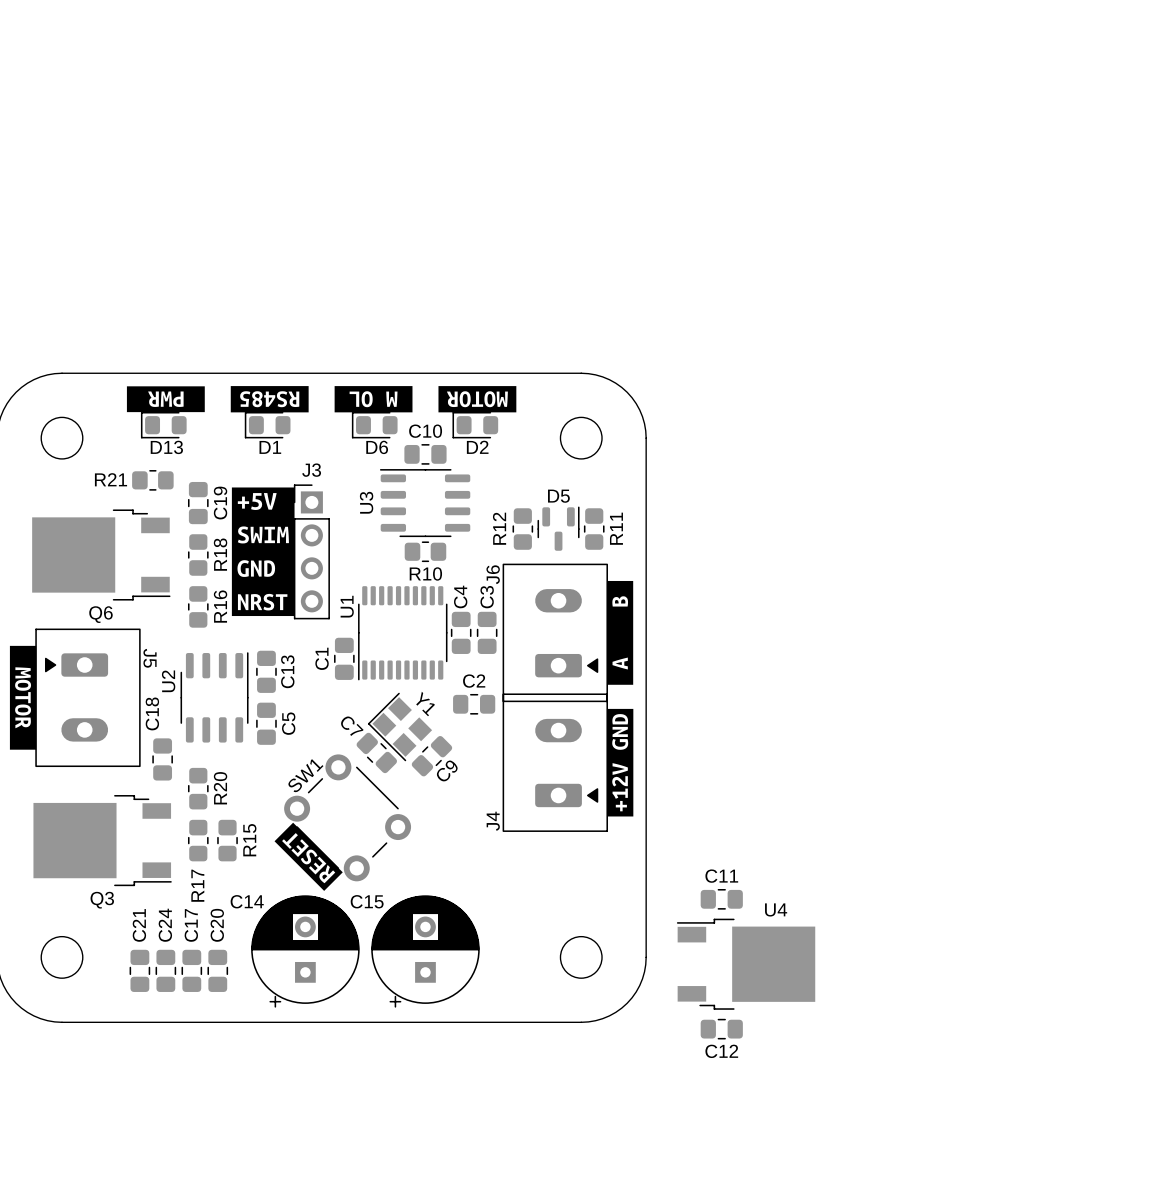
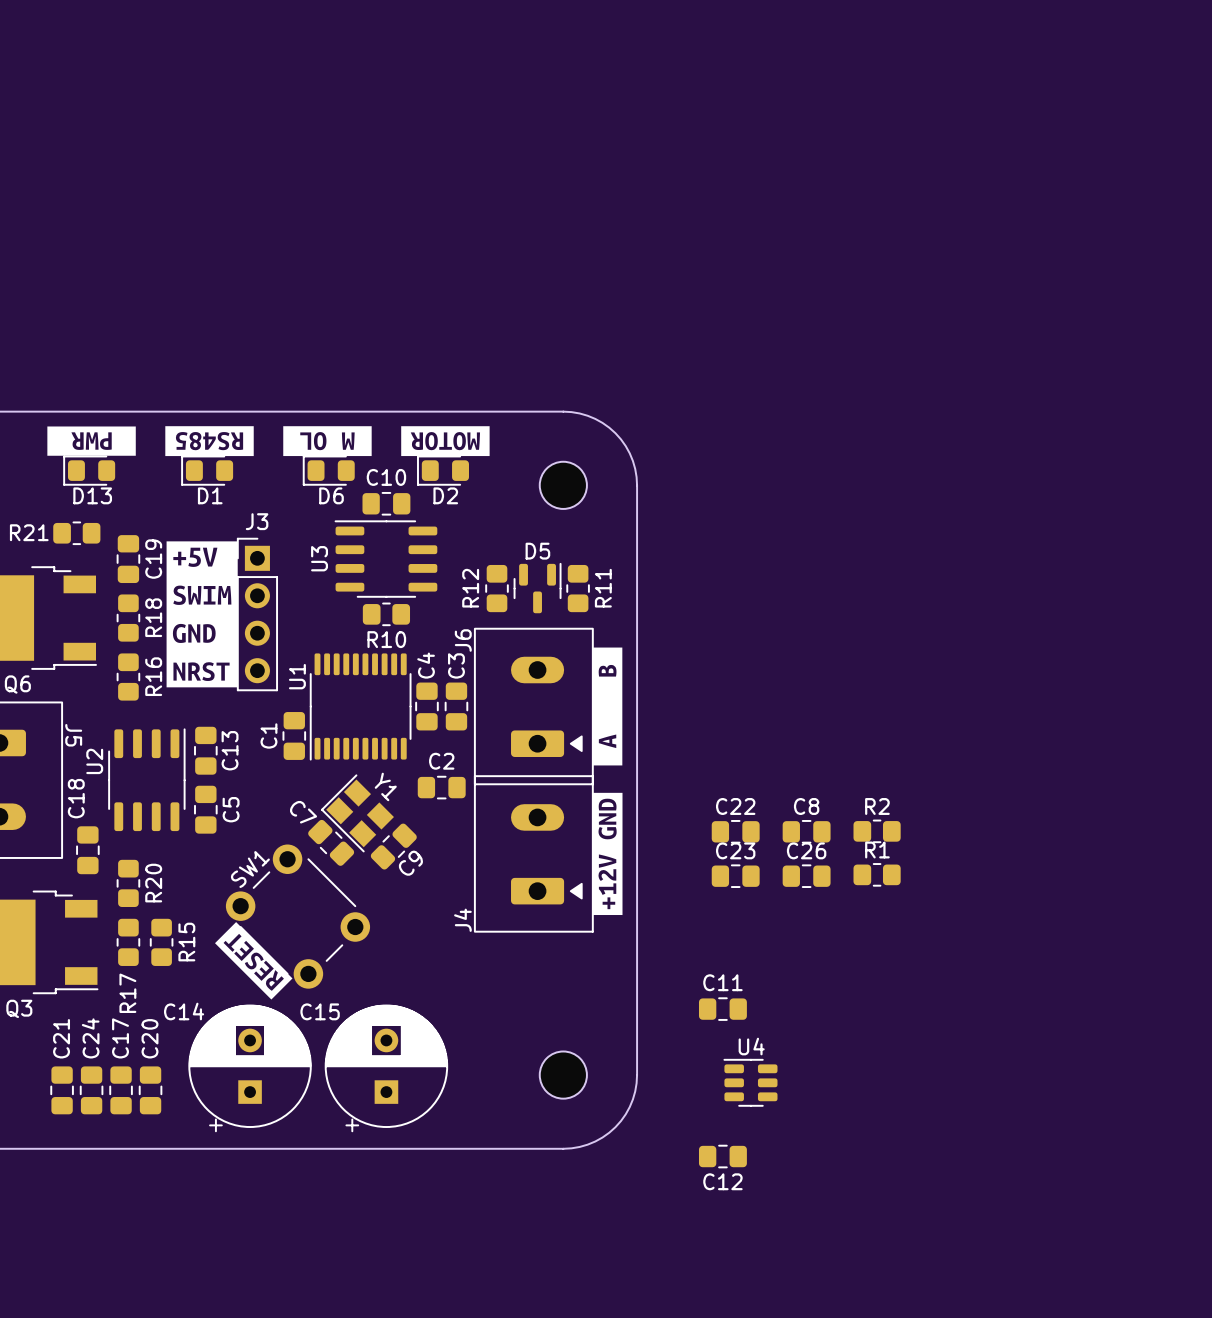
R2: none -> (877, 831)
C22: none -> (735, 831)
C8: none -> (806, 831)
R1: none -> (877, 874)
C23: none -> (735, 876)
C26: none -> (806, 876)
U4 name position: U4 (776, 909) -> U4 (751, 1046)
U4 footprint: [676, 918, 816, 1010] -> [723, 1058, 778, 1107]

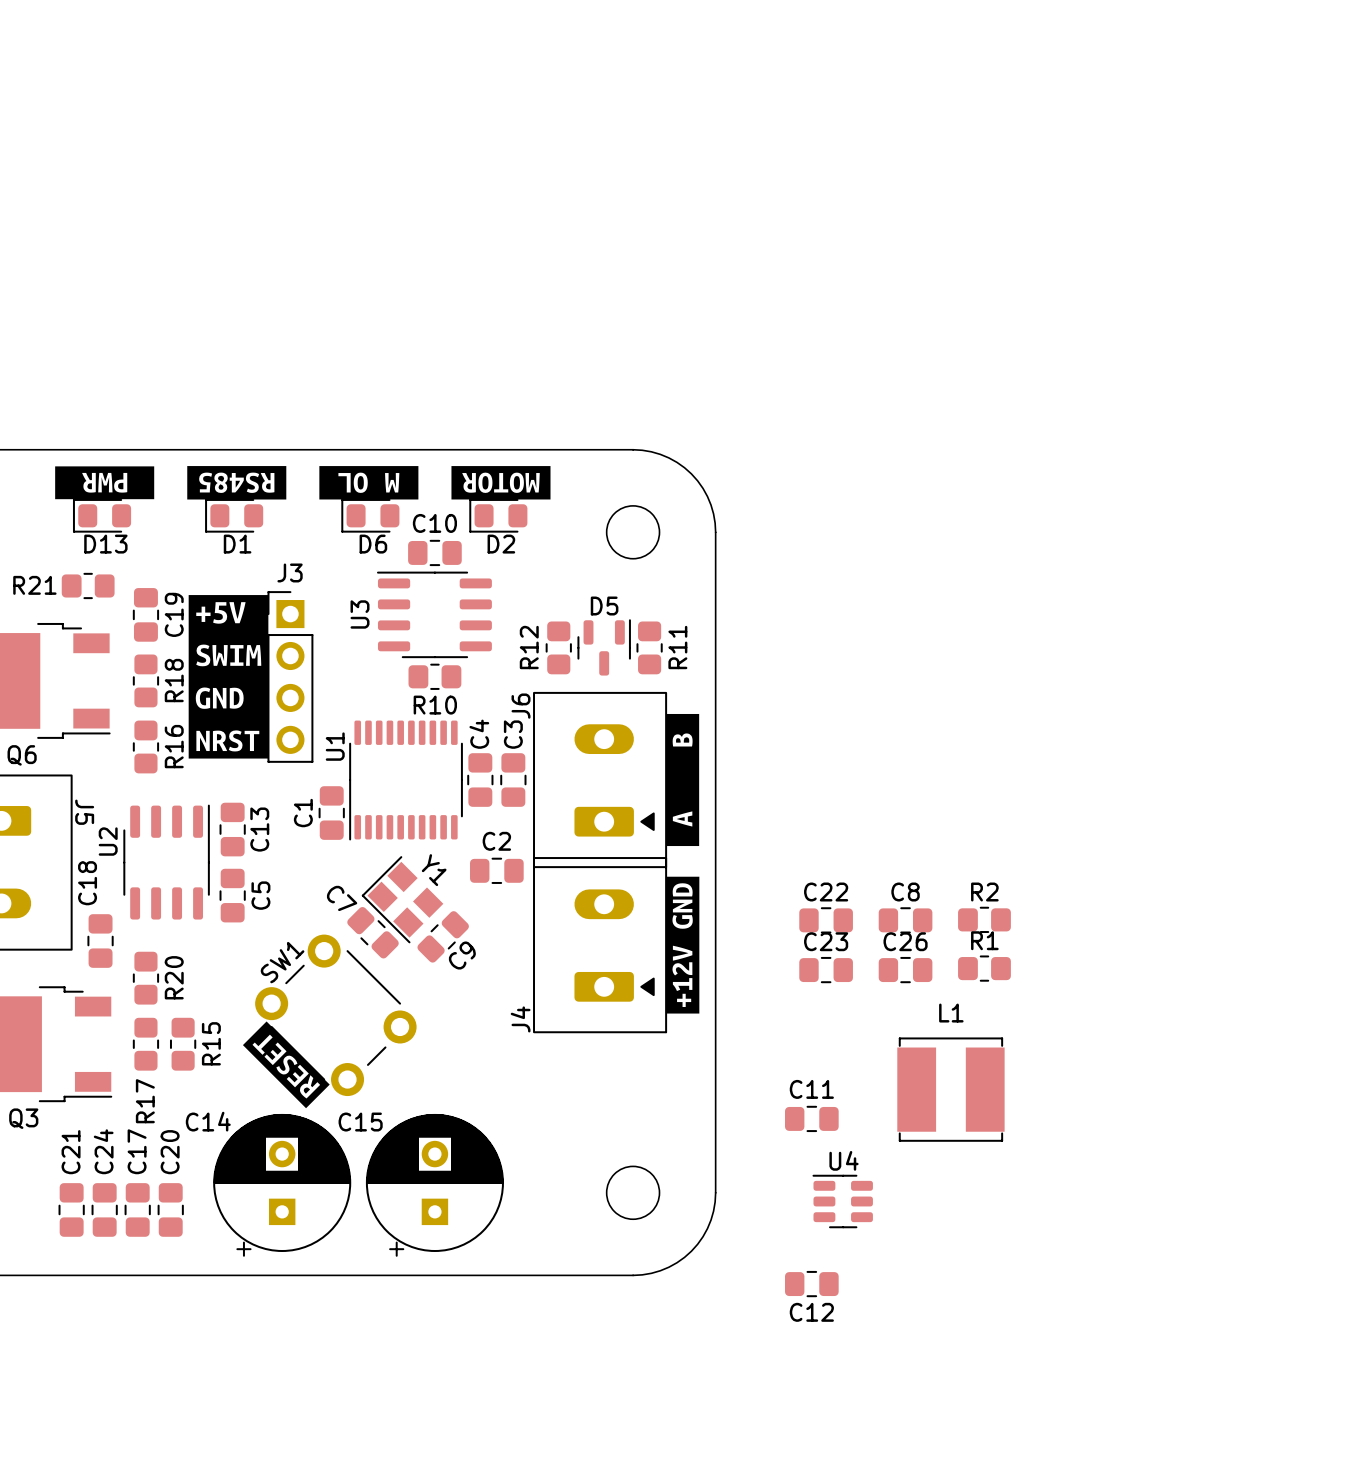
L1: none -> (950, 1089)

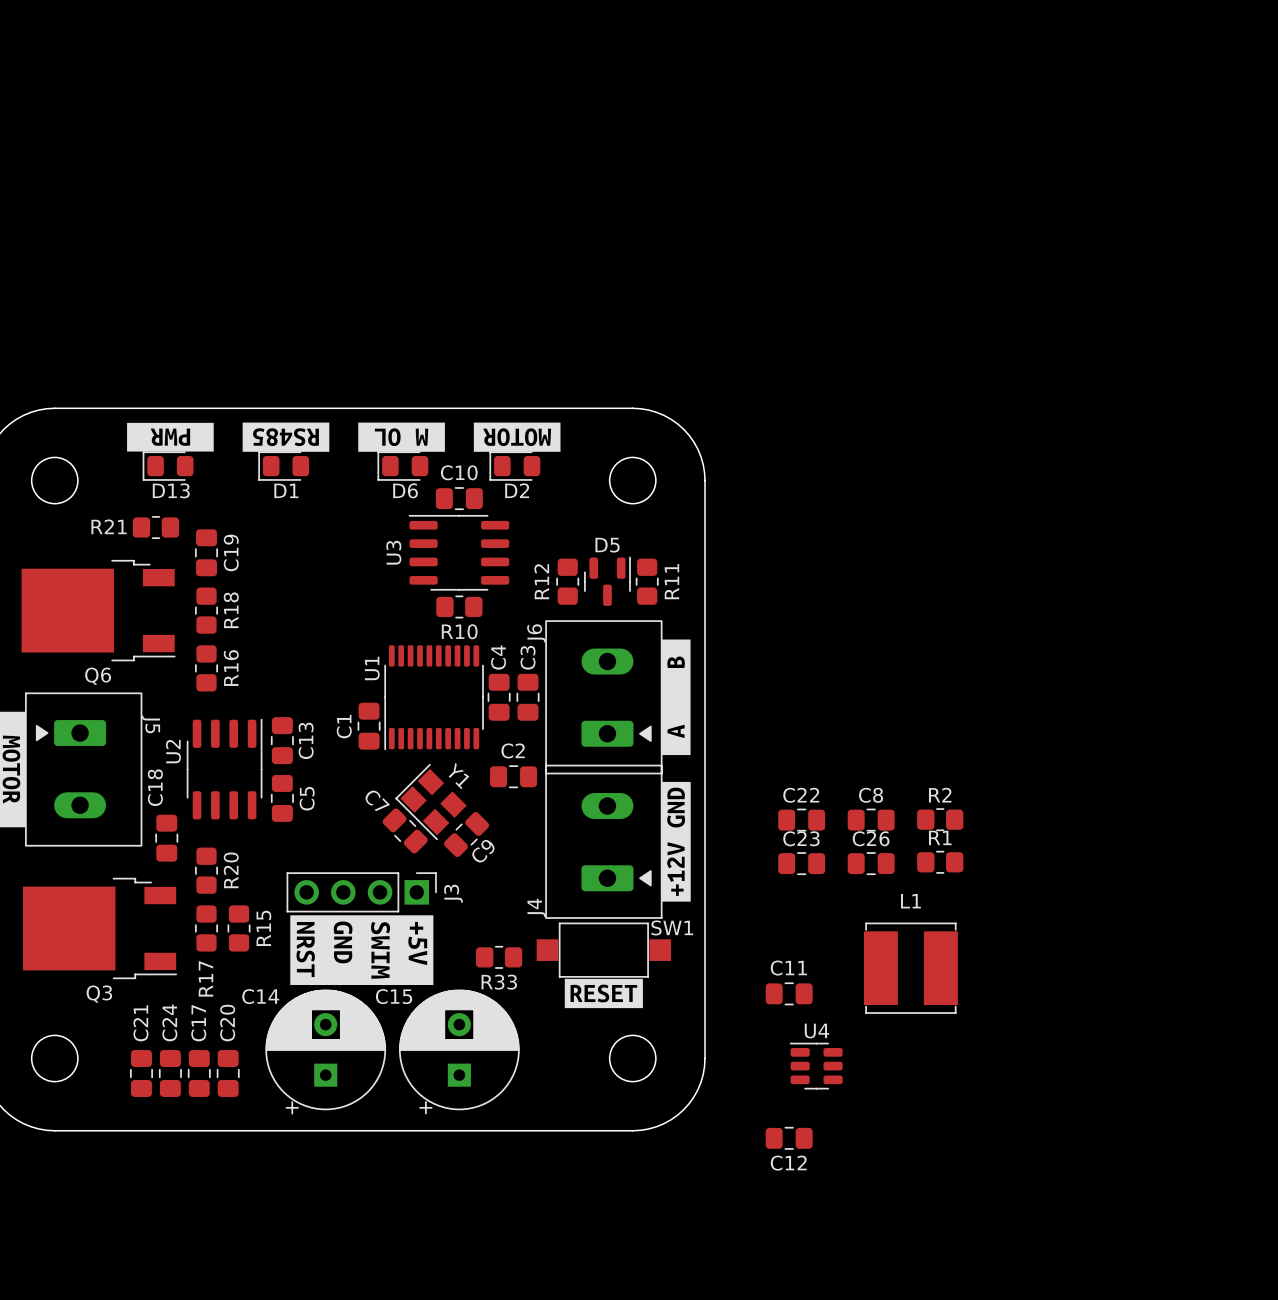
drawing: [188, 595, 269, 759] -> none
J3 rotation: 0° (290, 676) -> 90° clockwise (361, 892)
J3 position: (290, 676) -> (361, 892)
SW1 footprint: [255, 934, 417, 1097] -> [536, 922, 672, 978]
SW1 name position: SW1 (282, 962) -> SW1 (672, 927)
drawing: [242, 1021, 330, 1109] -> none
drawing: none -> [290, 915, 434, 986]
R33: none -> (499, 957)
drawing: none -> [564, 978, 643, 1009]

